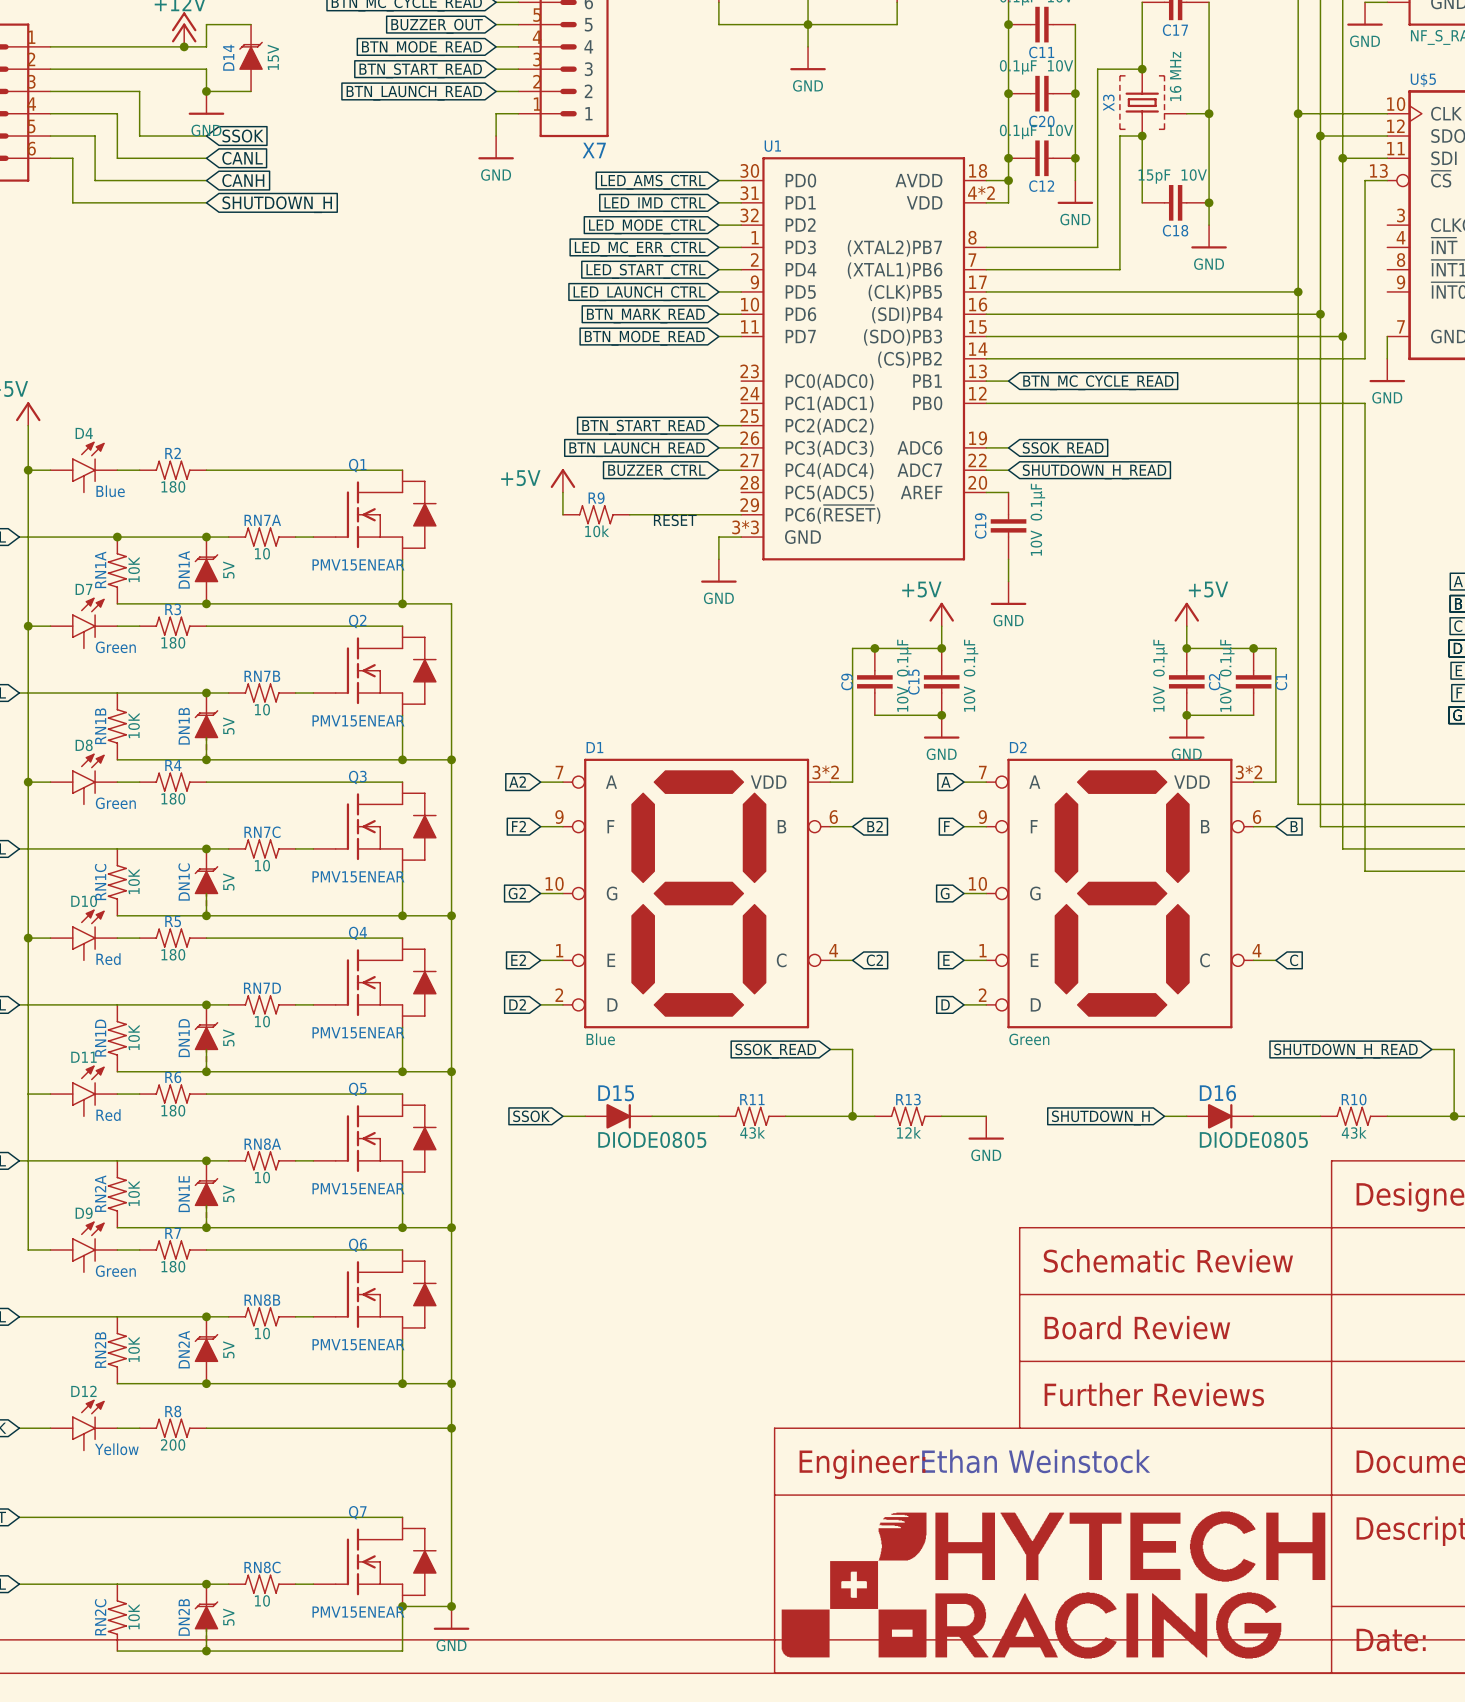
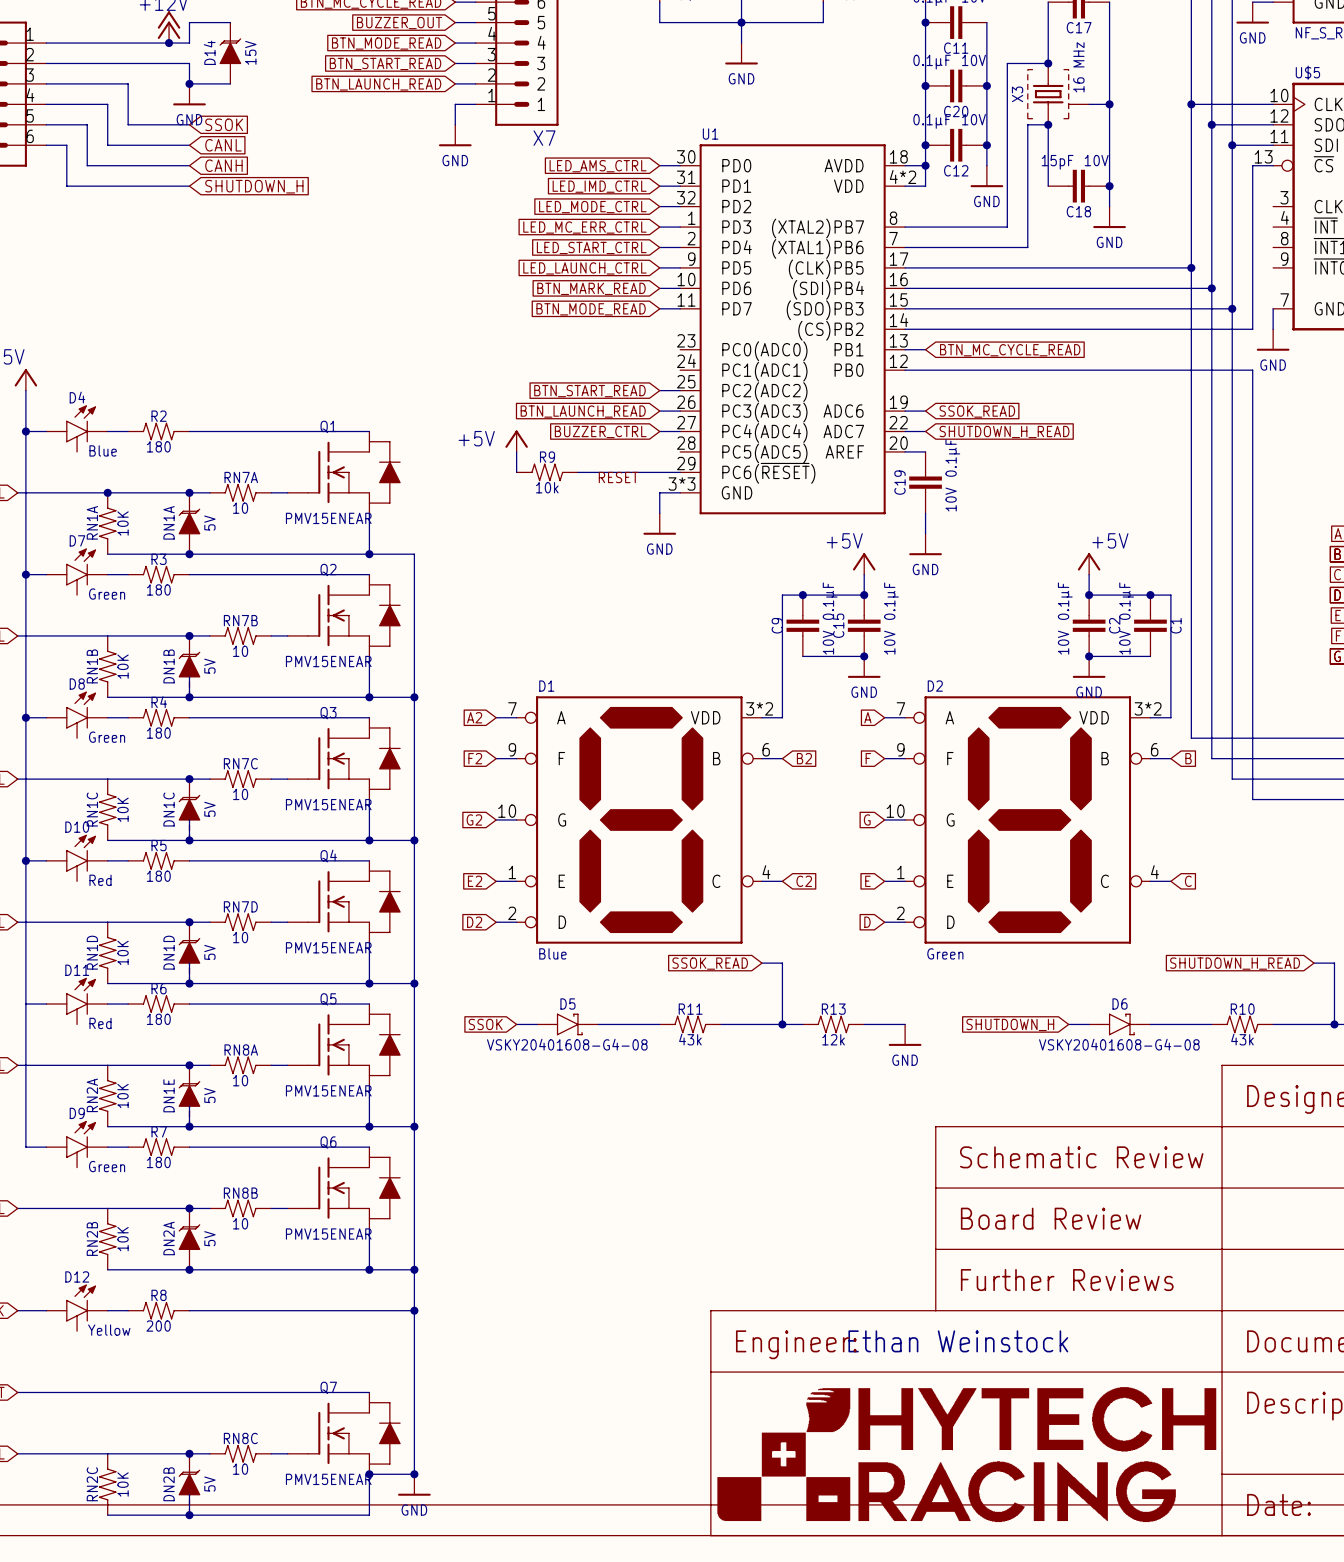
D15: DIODE0805 (618, 1116) -> none
D5: none -> (567, 1024)
D16: DIODE0805 (1220, 1116) -> none
D6: none -> (1119, 1024)

